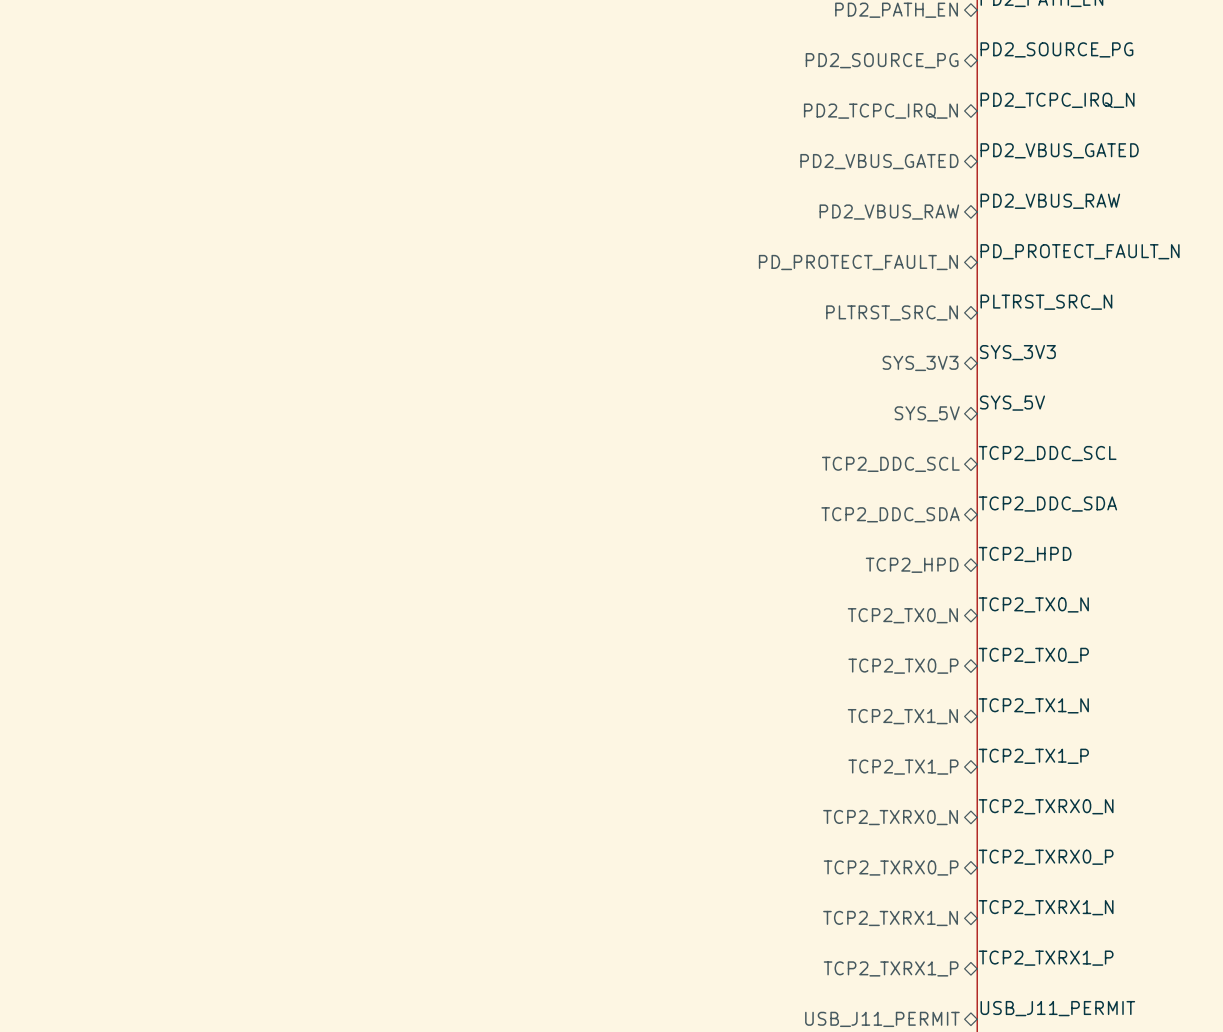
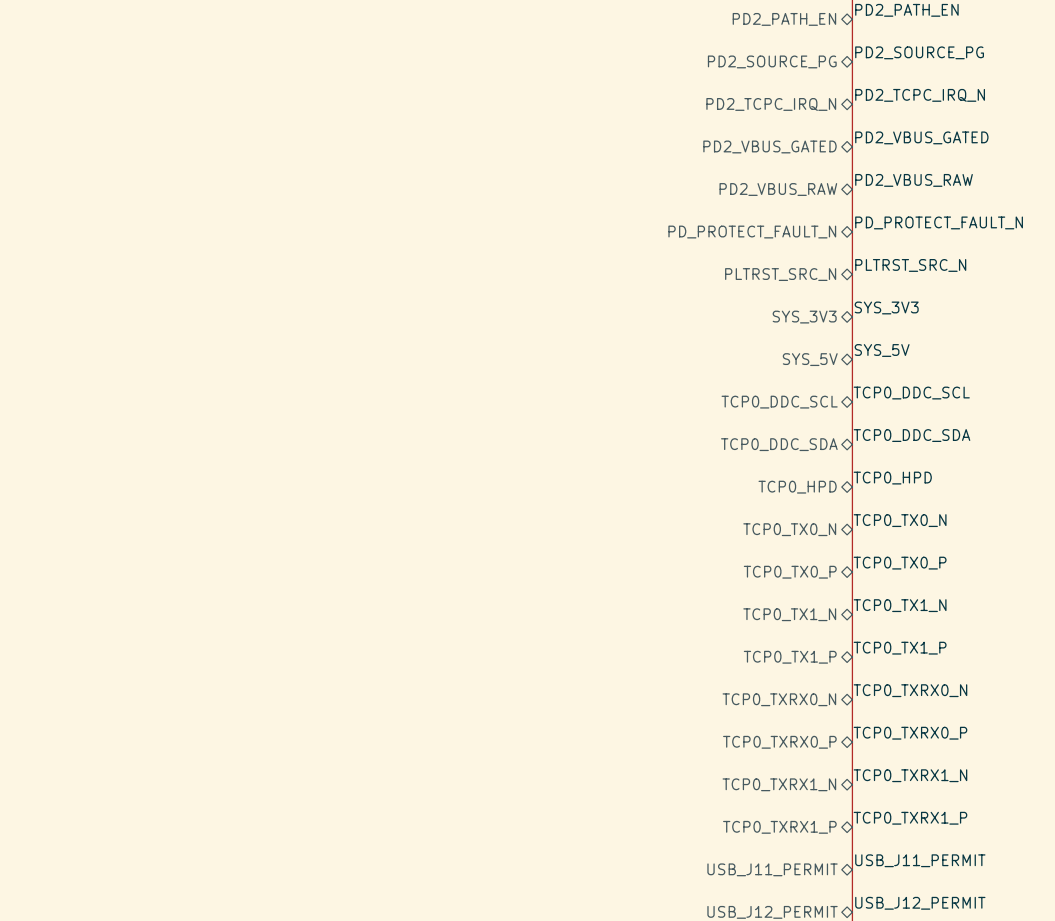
label: TCP2_DDC_SCL (1047, 453) -> TCP0_DDC_SCL (911, 393)
sheet pin: TCP2_DDC_SCL (890, 464) -> TCP0_DDC_SCL (779, 402)
label: TCP2_DDC_SDA (1047, 504) -> TCP0_DDC_SDA (911, 435)
sheet pin: TCP2_DDC_SDA (890, 514) -> TCP0_DDC_SDA (779, 444)
label: TCP2_HPD (1025, 554) -> TCP0_HPD (892, 478)
sheet pin: TCP2_HPD (912, 565) -> TCP0_HPD (797, 487)
label: TCP2_TX0_N (1033, 604) -> TCP0_TX0_N (900, 520)
sheet pin: TCP2_TX0_N (902, 615) -> TCP0_TX0_N (789, 529)
label: TCP2_TX0_P (1033, 655) -> TCP0_TX0_P (900, 563)
sheet pin: TCP2_TX0_P (903, 666) -> TCP0_TX0_P (790, 572)
label: TCP2_TX1_N (1033, 705) -> TCP0_TX1_N (900, 605)
sheet pin: TCP2_TX1_N (902, 716) -> TCP0_TX1_N (789, 614)
label: TCP2_TX1_P (1033, 756) -> TCP0_TX1_P (900, 648)
sheet pin: TCP2_TX1_P (903, 767) -> TCP0_TX1_P (790, 657)
label: TCP2_TXRX0_N (1046, 806) -> TCP0_TXRX0_N (910, 690)
sheet pin: TCP2_TXRX0_N (890, 817) -> TCP0_TXRX0_N (779, 699)
label: TCP2_TXRX0_P (1046, 857) -> TCP0_TXRX0_P (910, 733)
sheet pin: TCP2_TXRX0_P (891, 868) -> TCP0_TXRX0_P (779, 742)
label: TCP2_TXRX1_N (1046, 907) -> TCP0_TXRX1_N (910, 775)
sheet pin: TCP2_TXRX1_N (890, 918) -> TCP0_TXRX1_N (779, 784)
label: TCP2_TXRX1_P (1046, 958) -> TCP0_TXRX1_P (910, 818)
sheet pin: TCP2_TXRX1_P (891, 968) -> TCP0_TXRX1_P (779, 827)

